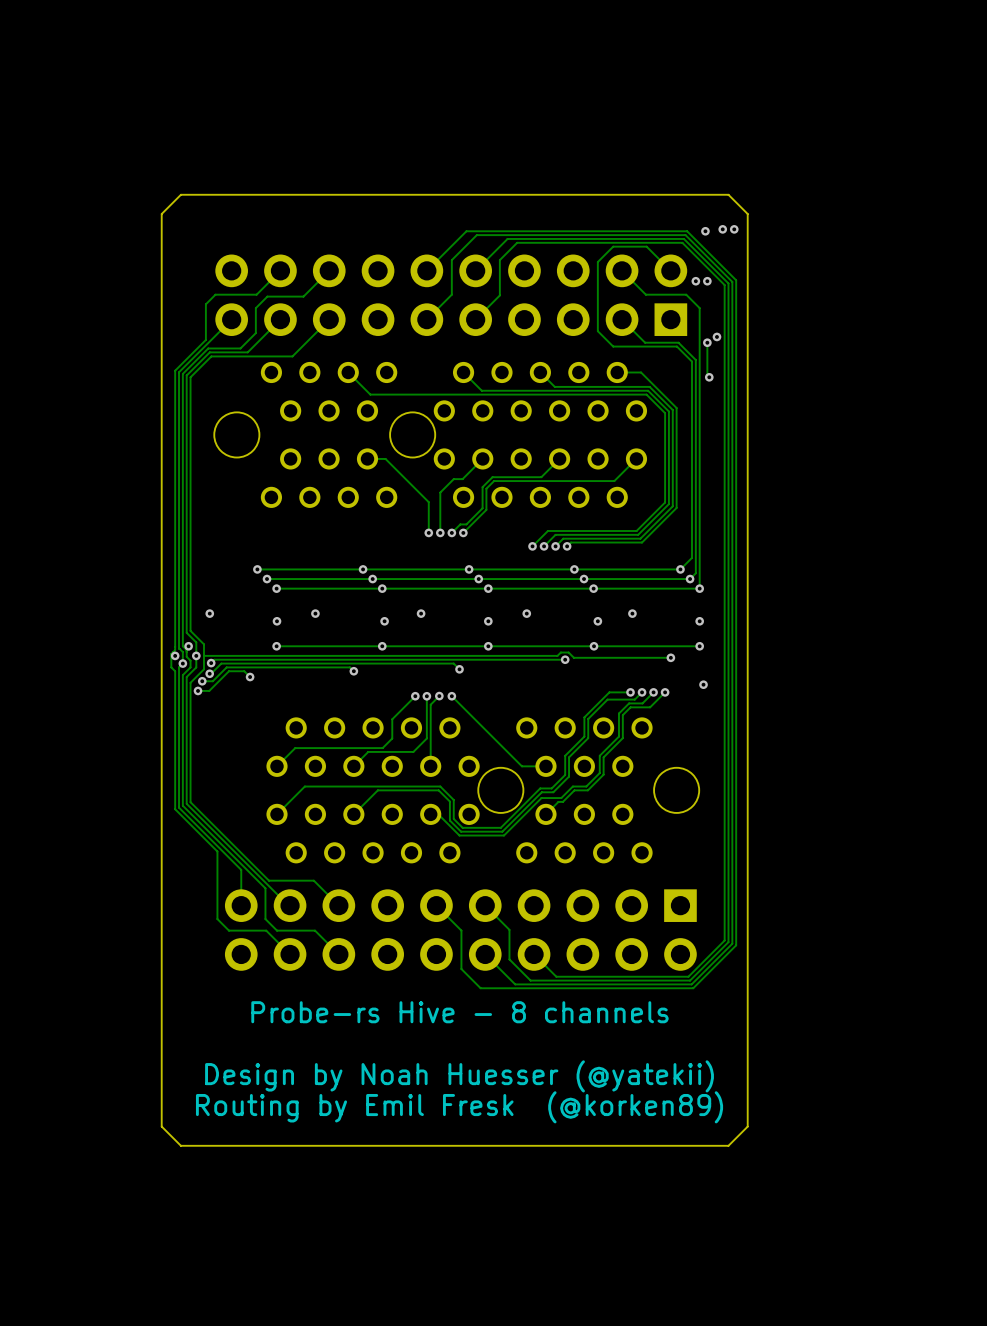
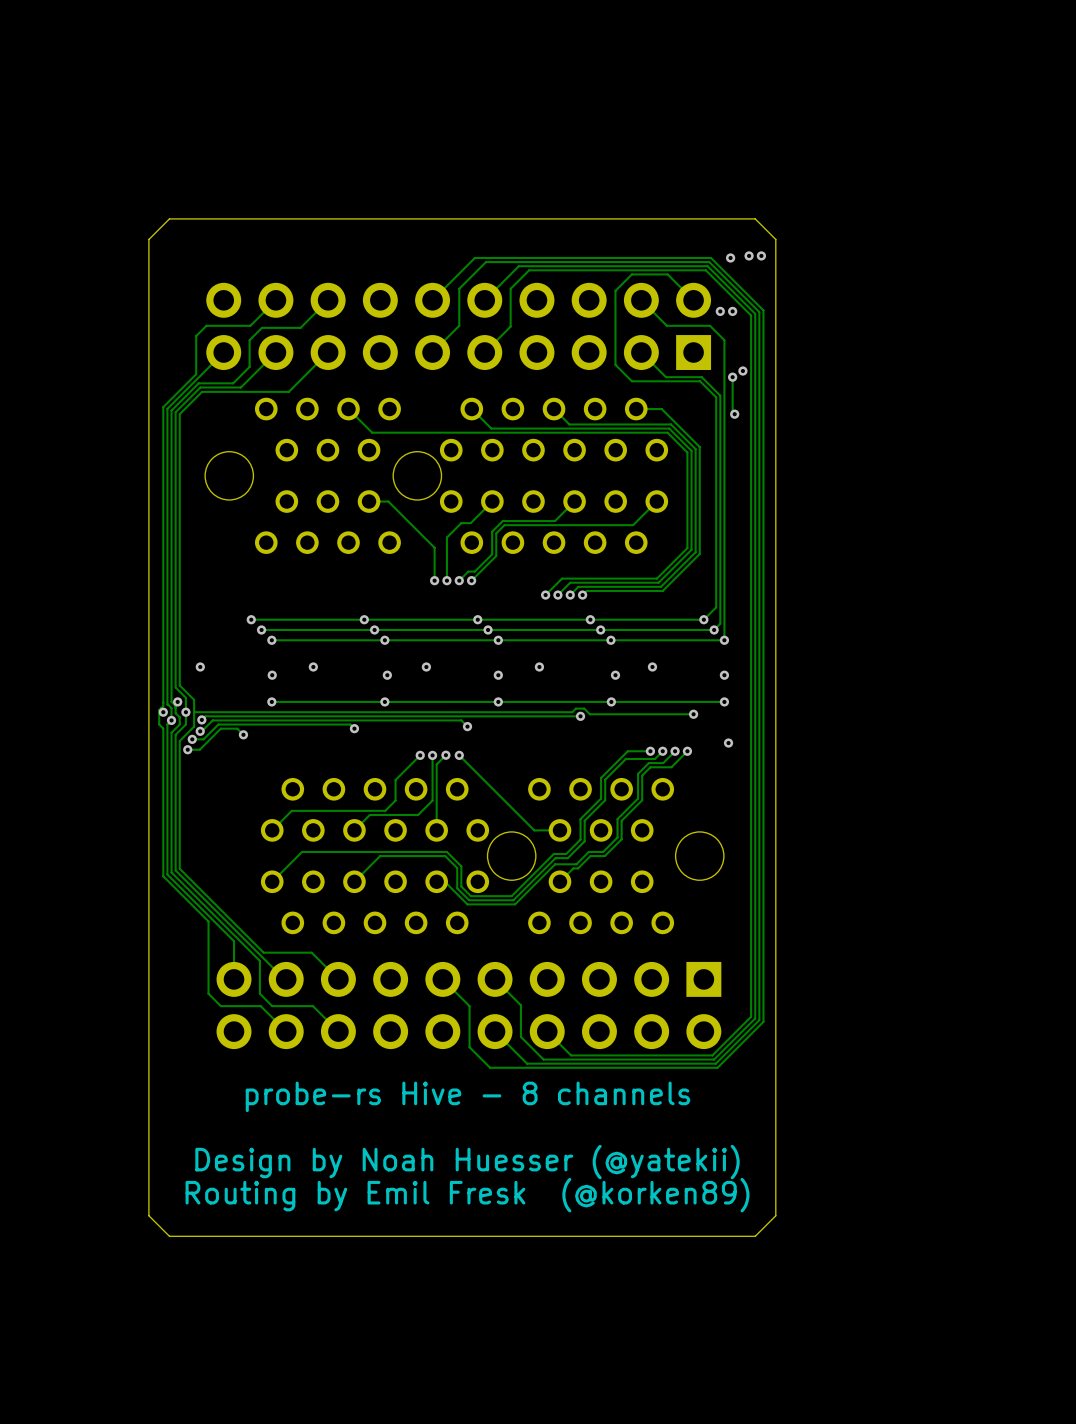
text: Probe-rs Hive - 8 channels (459, 1012) -> probe-rs Hive - 8 channels (467, 1096)

